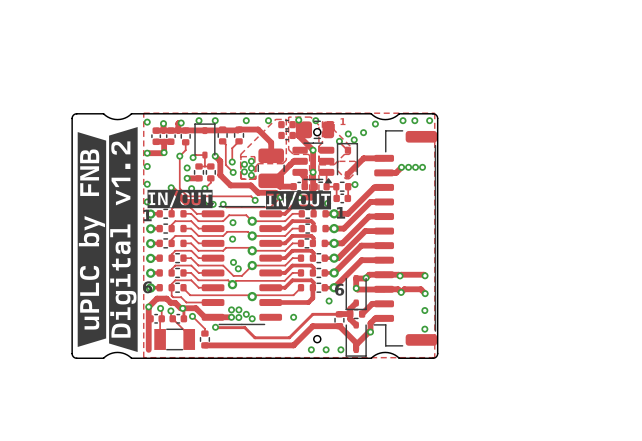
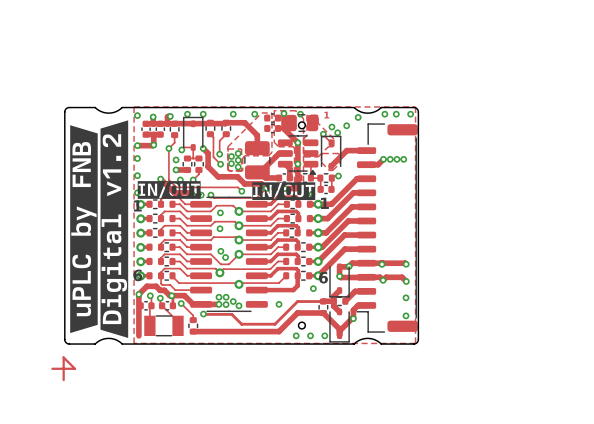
track: none -> (52, 368) (74, 368) (63, 357) (63, 380)

